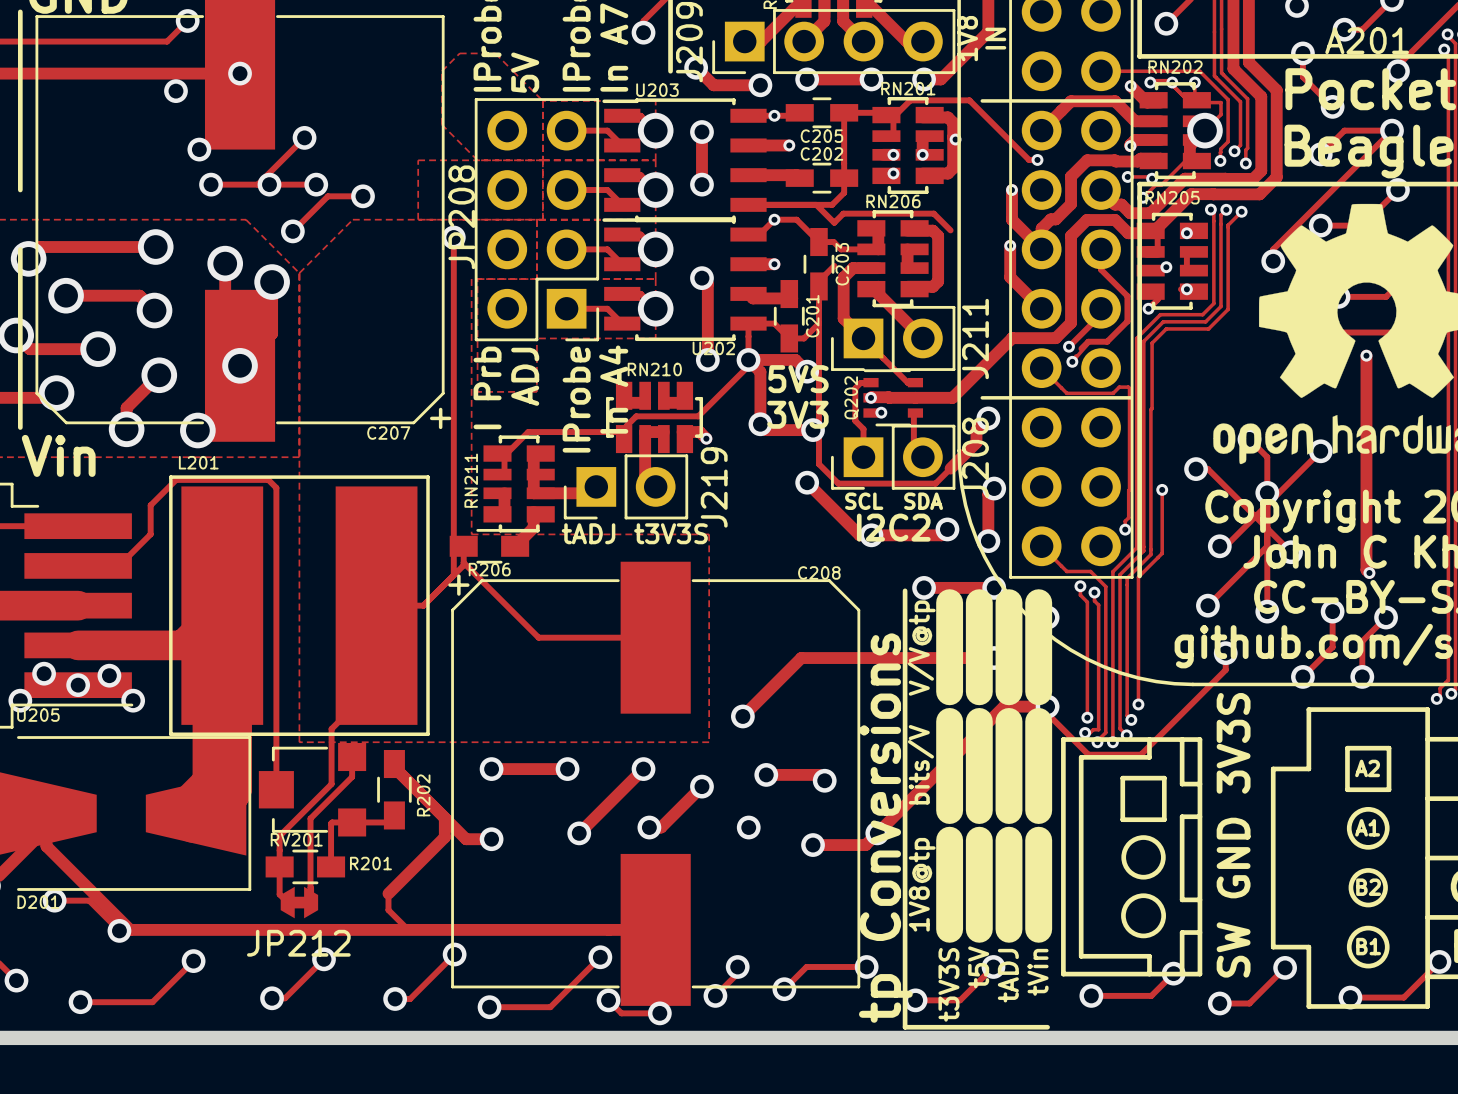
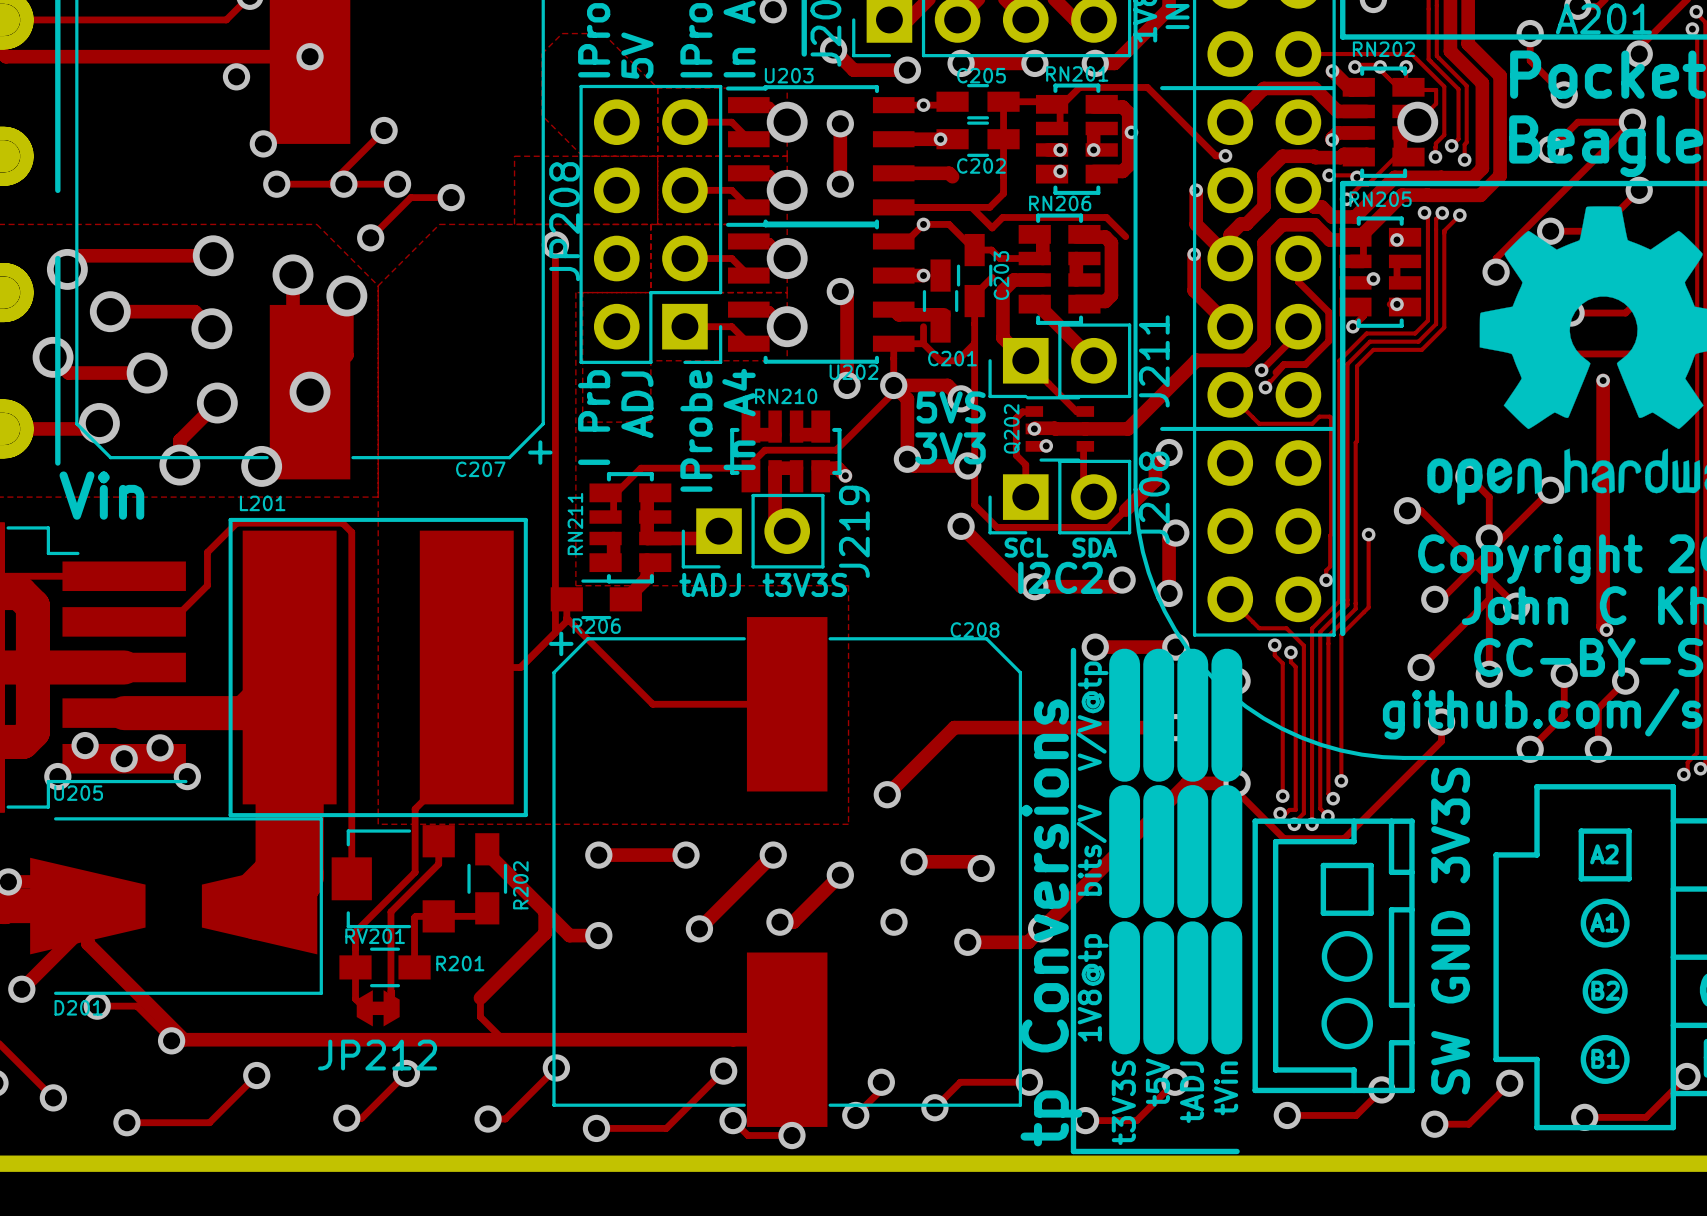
C205 name position: C205 (821, 136) -> C205 (981, 75)
C202 name position: C202 (821, 153) -> C202 (981, 165)
C202 position: (821, 178) -> (978, 139)
track: none -> (923, 326) (923, 343)
C201 position: (789, 316) -> (940, 301)
C201 name rotation: 0° (812, 316) -> 90° clockwise (952, 358)

